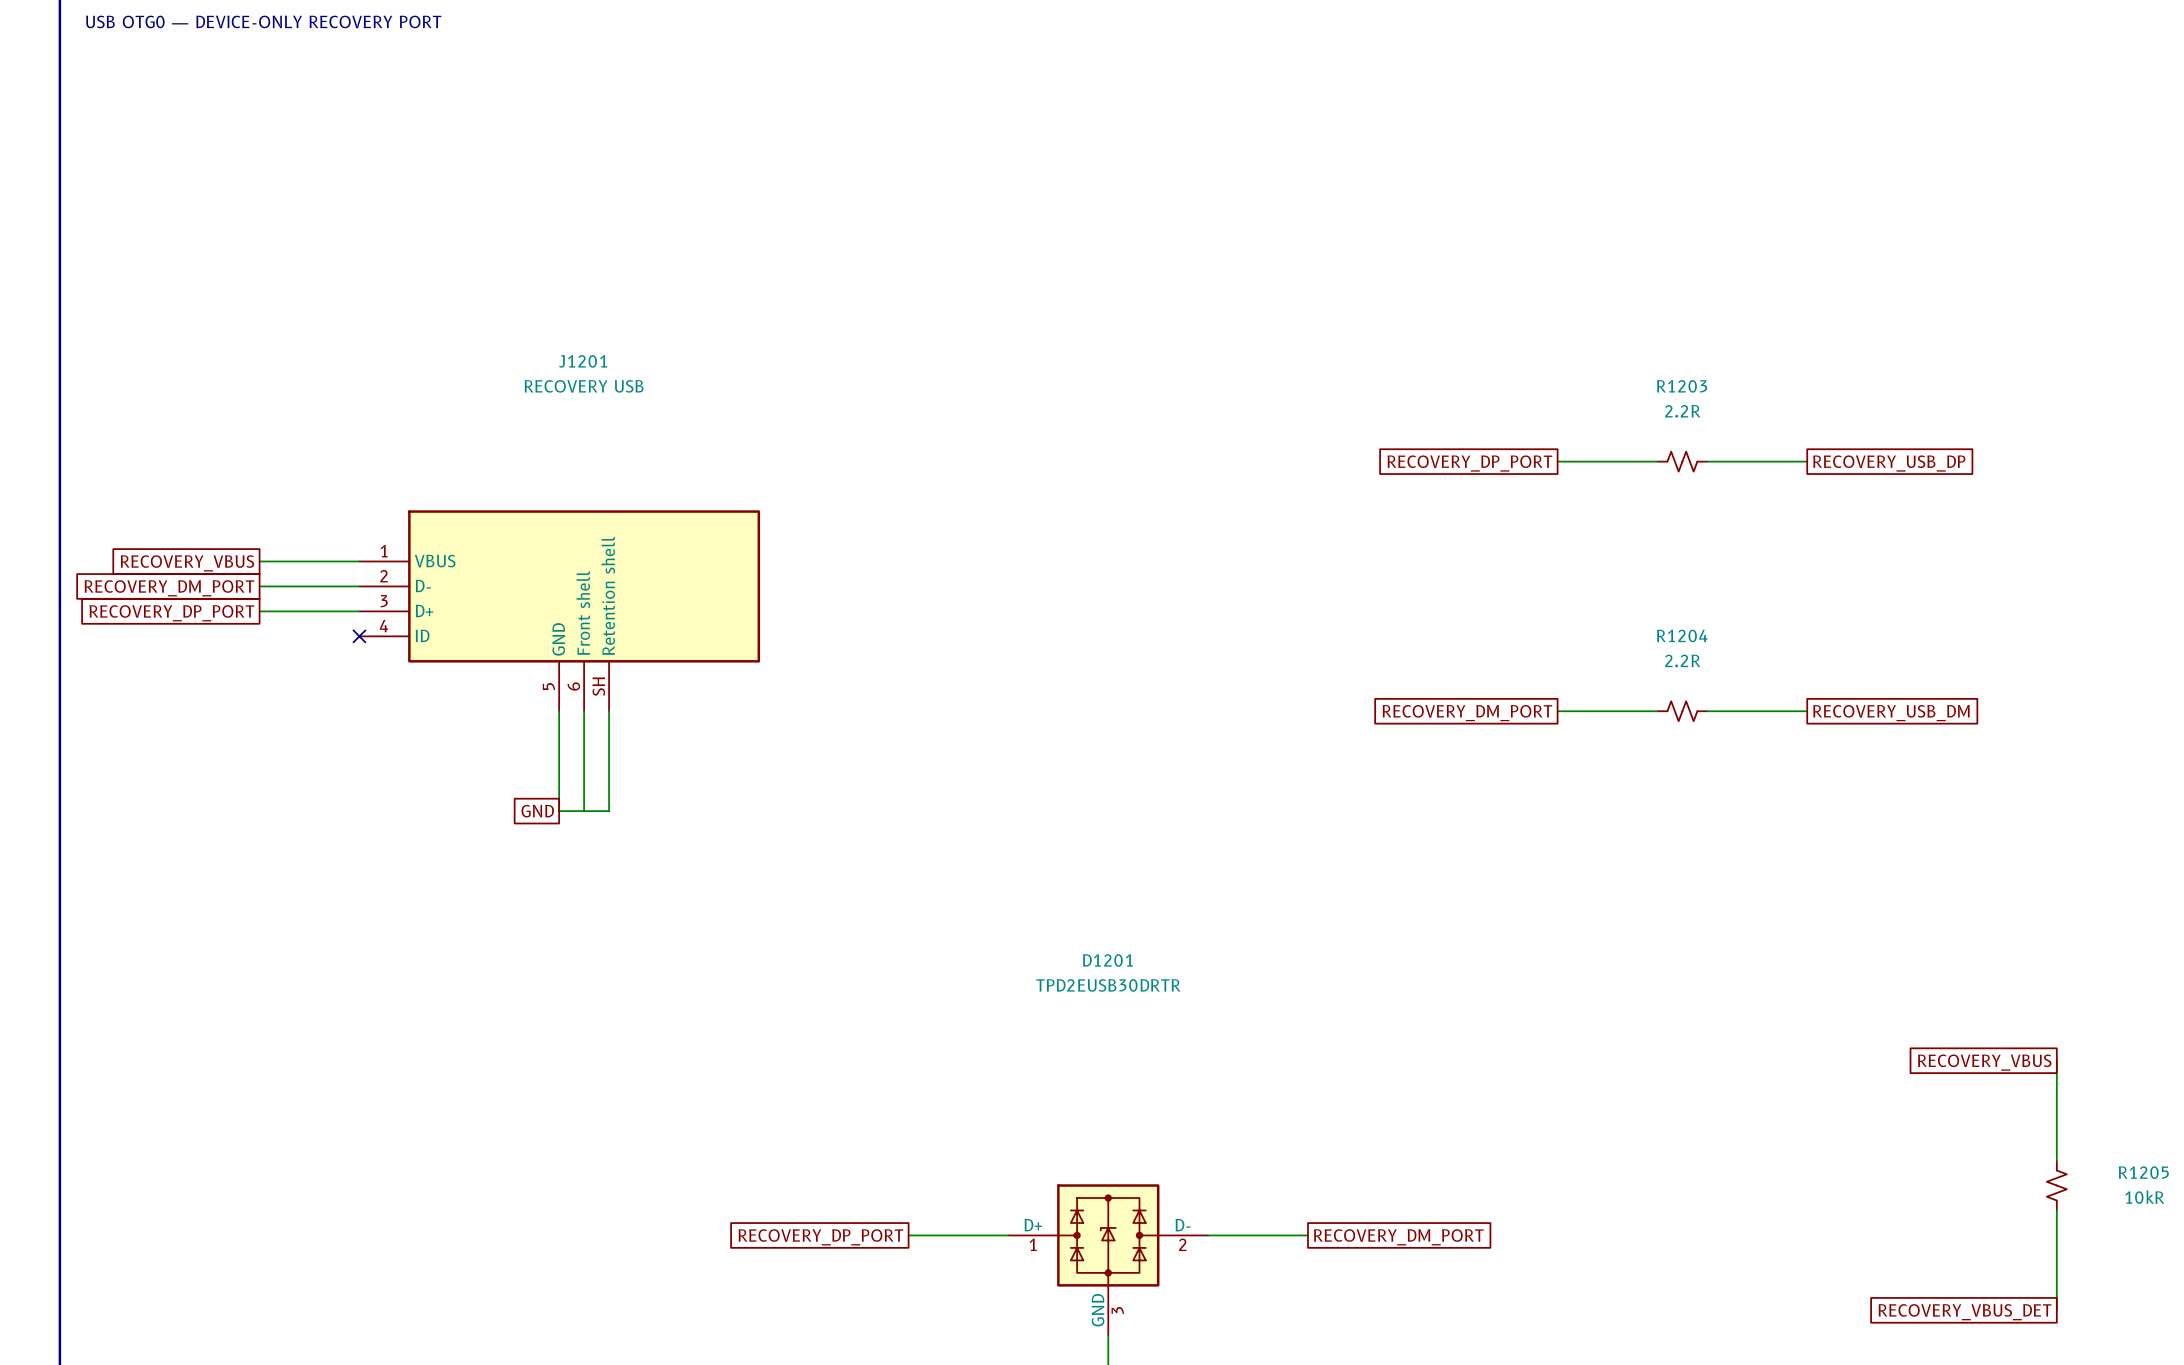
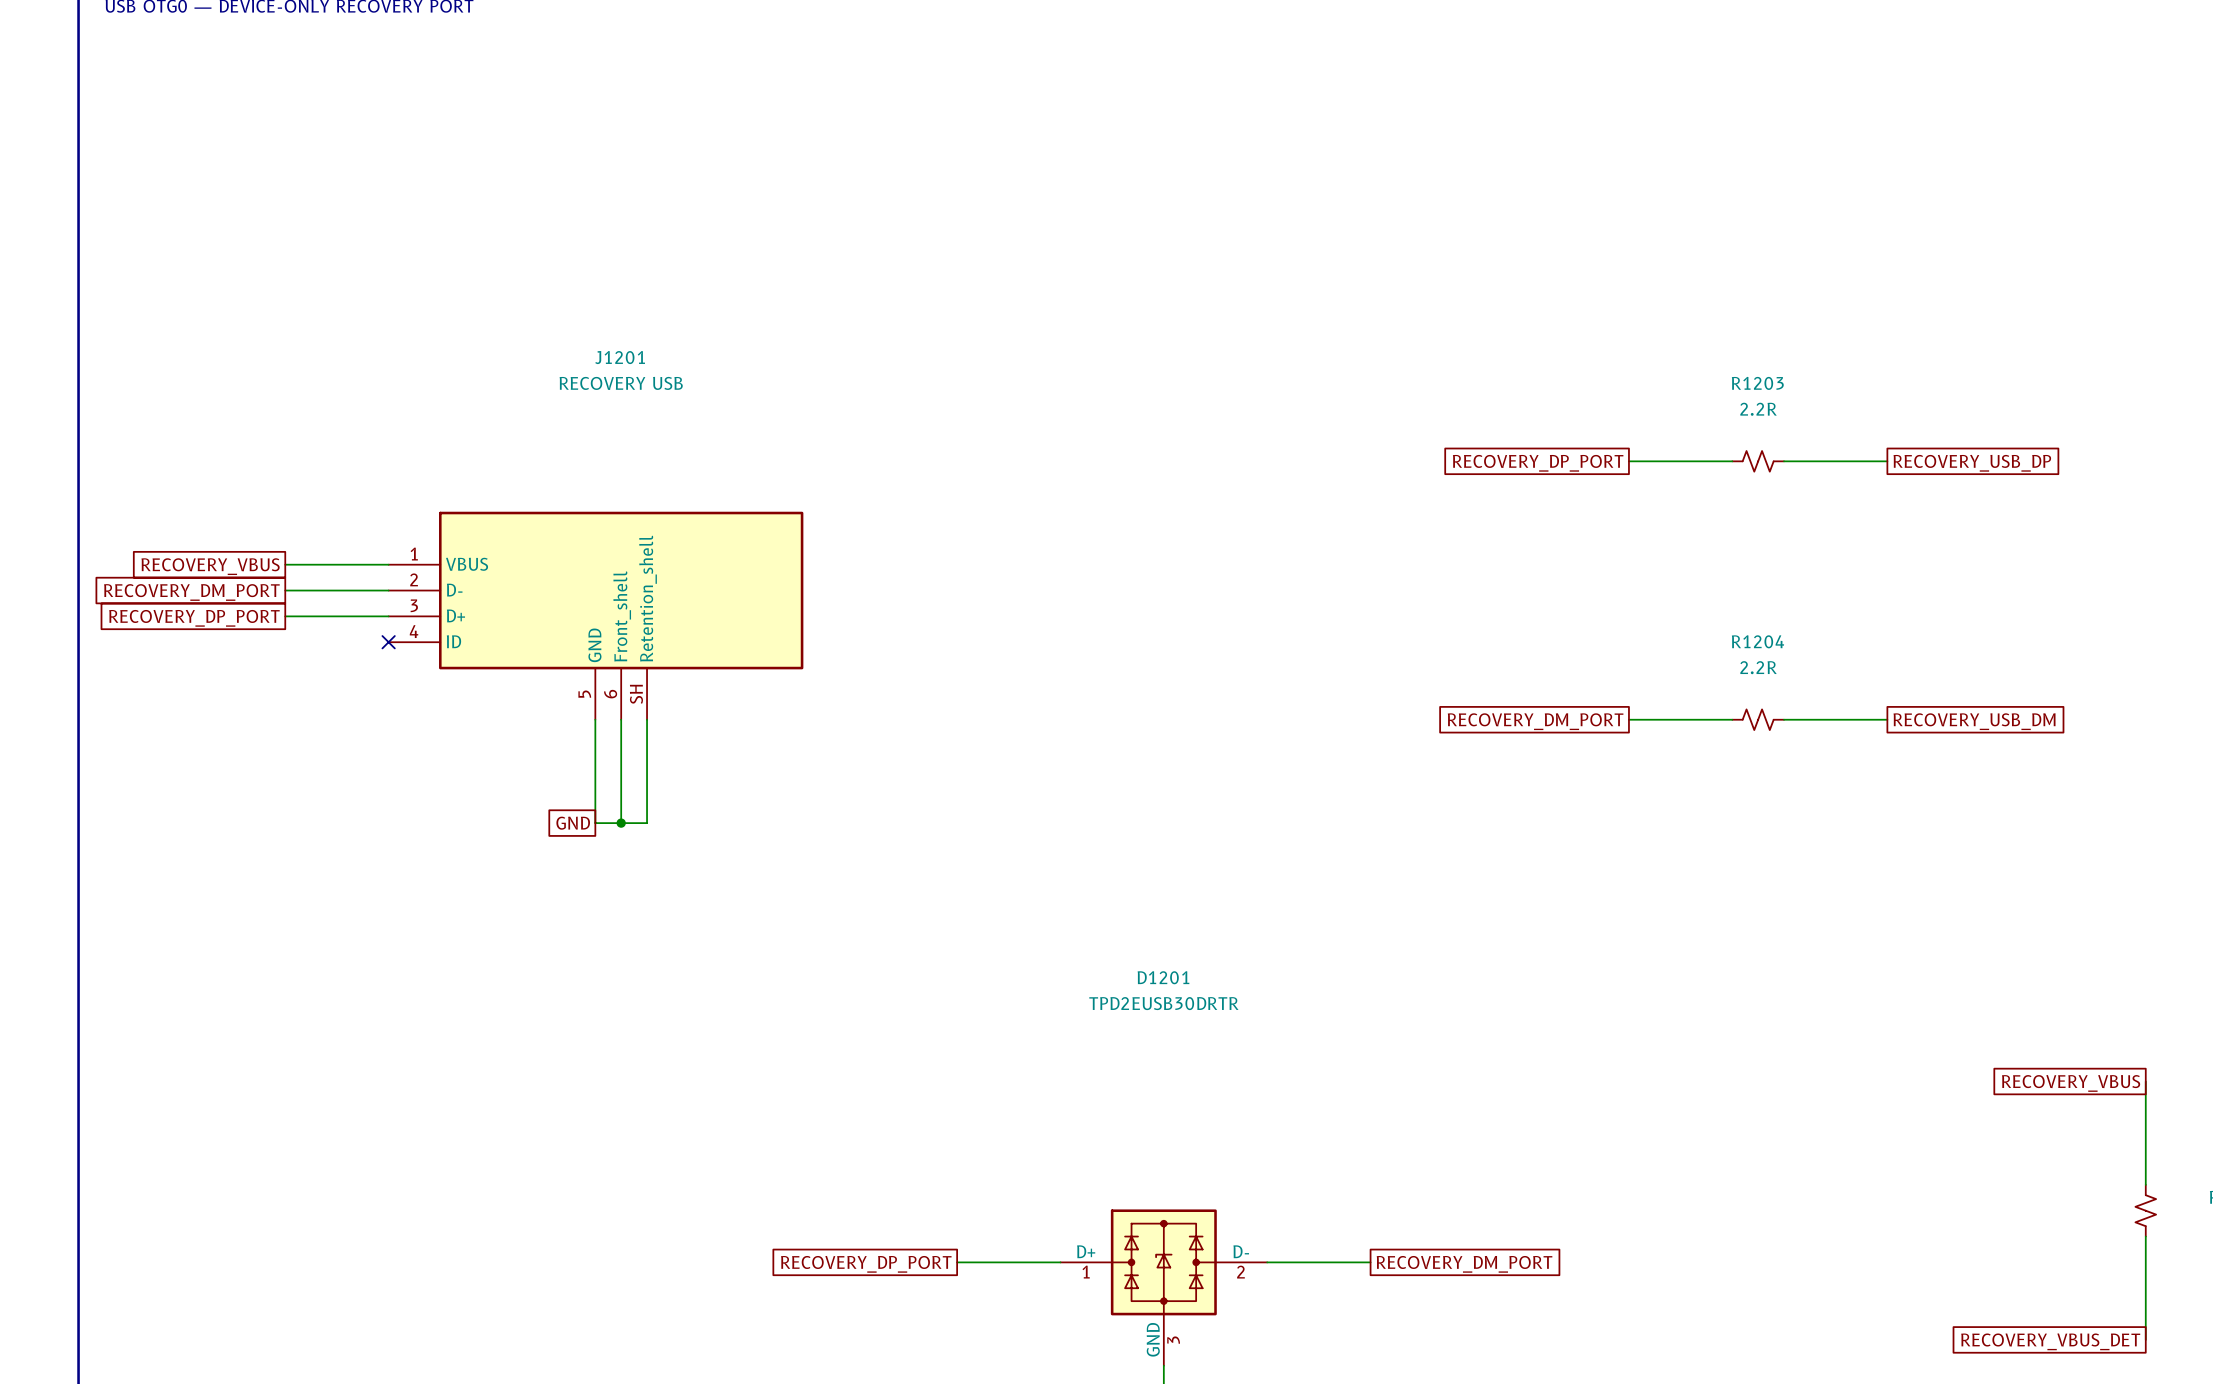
J1201 pin name: Retention shell (608, 595) -> Retention_shell (648, 598)
J1201 pin name: Front shell (583, 613) -> Front_shell (622, 616)
junction: none -> (621, 823)

